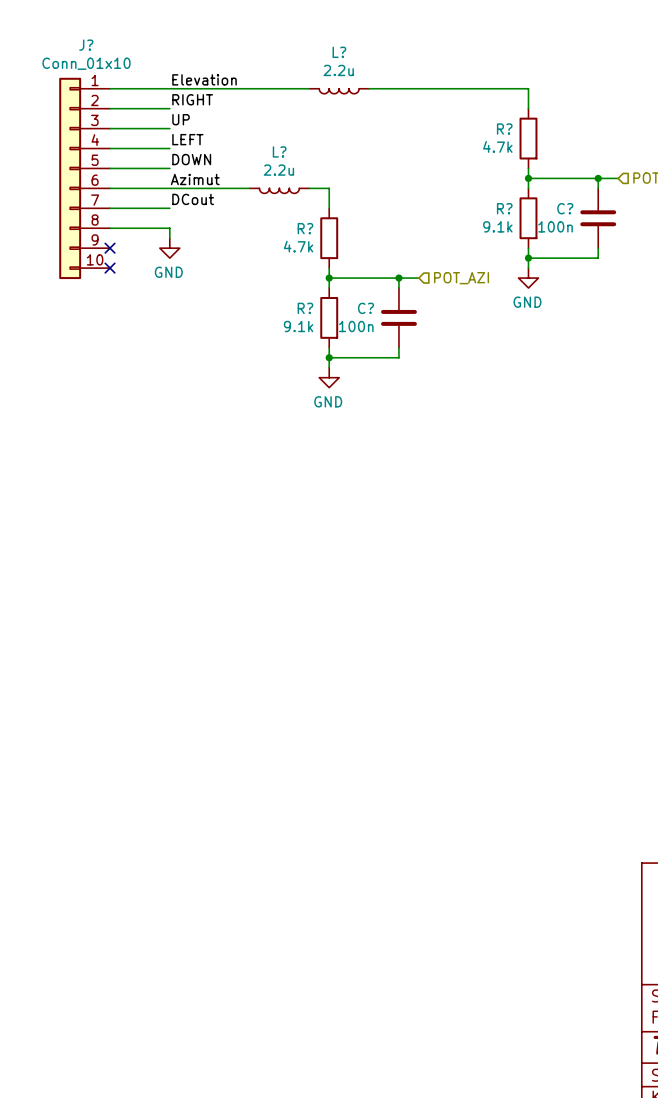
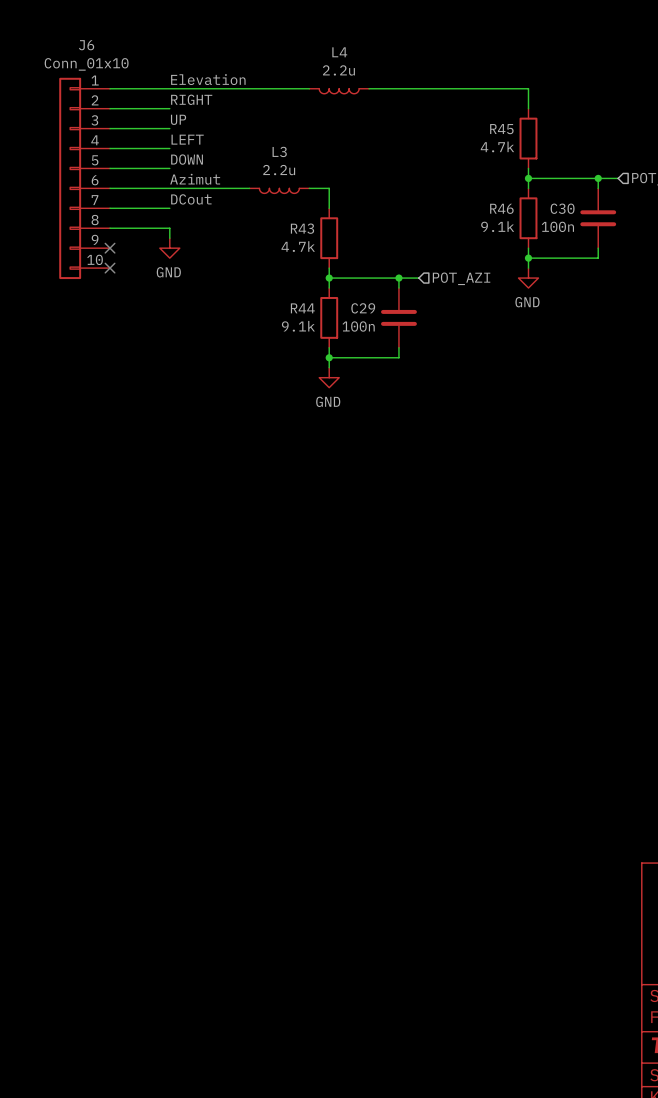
J? name: J? (86, 45) -> J6 (86, 45)
L? name: L? (339, 52) -> L4 (339, 52)
R? name: R? (504, 129) -> R45 (501, 129)
L? name: L? (279, 151) -> L3 (279, 151)
R? name: R? (504, 208) -> R46 (501, 208)
C? name: C? (565, 208) -> C30 (562, 208)
R? name: R? (305, 228) -> R43 (302, 228)
R? name: R? (305, 308) -> R44 (302, 308)
C? name: C? (366, 308) -> C29 (363, 308)

